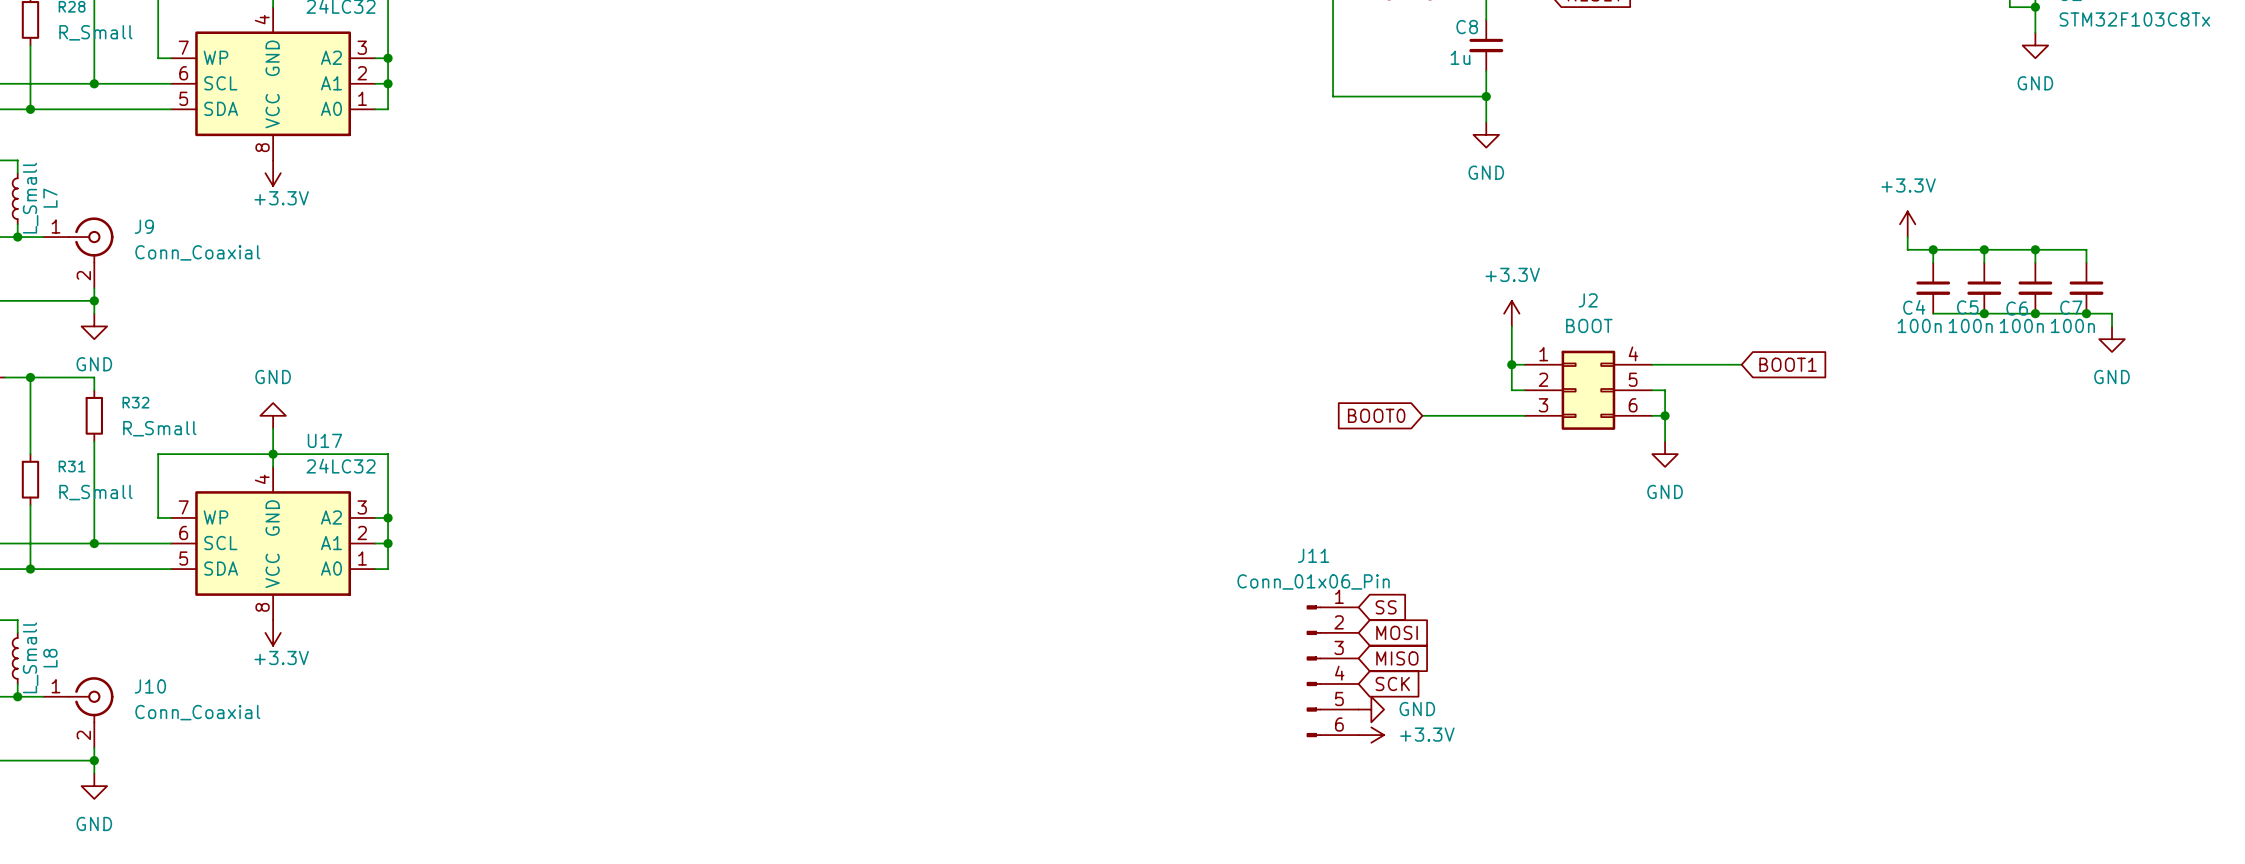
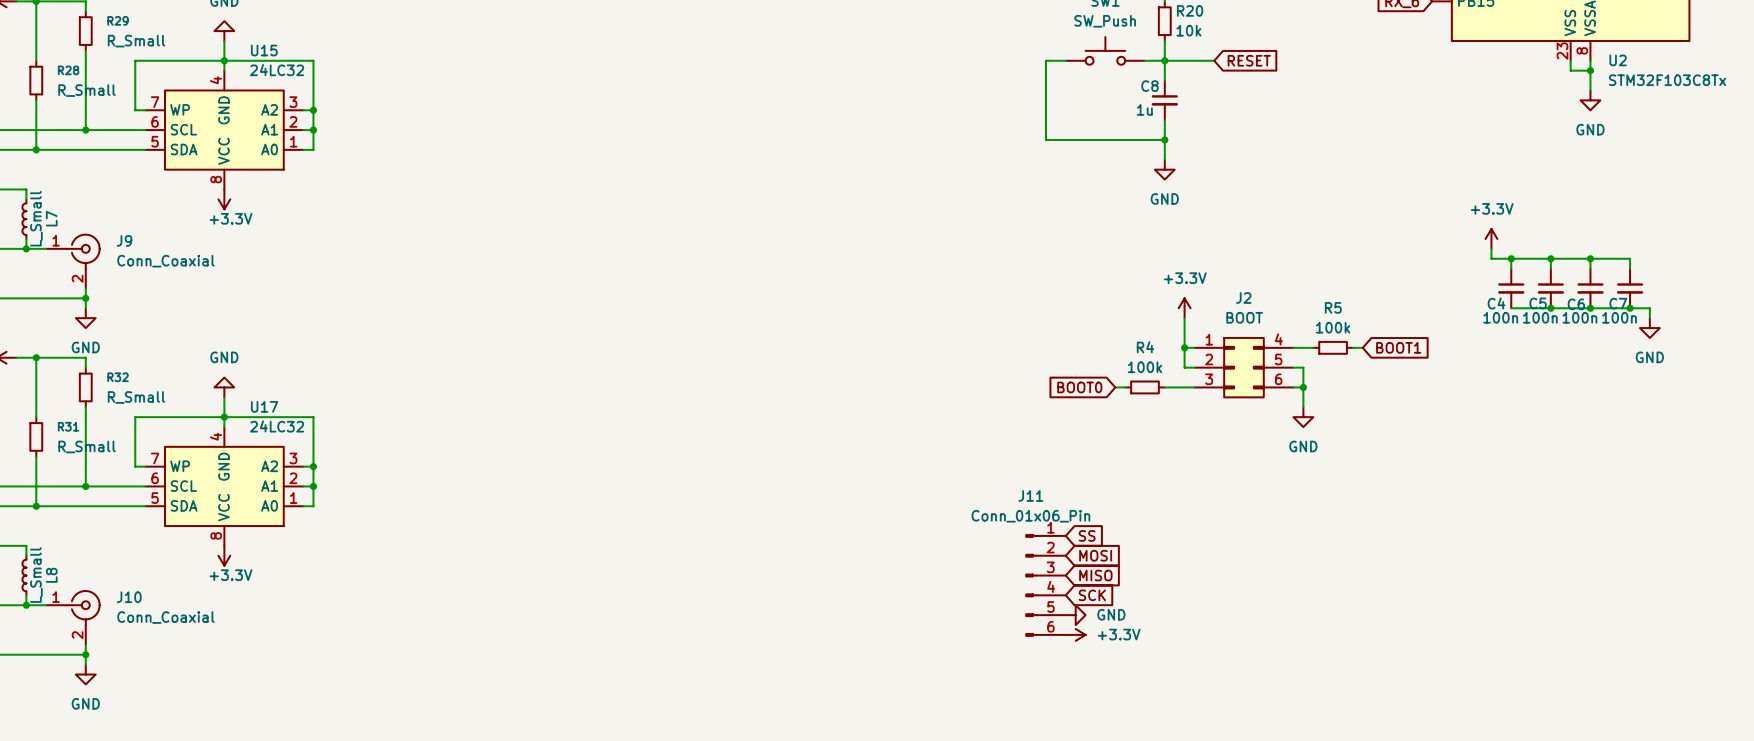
wire: (1677, 364) (1728, 364) -> none
R5: none -> 100k (1333, 347)
wire: (1435, 415) (1486, 415) -> none
R4: none -> 100k (1144, 387)

